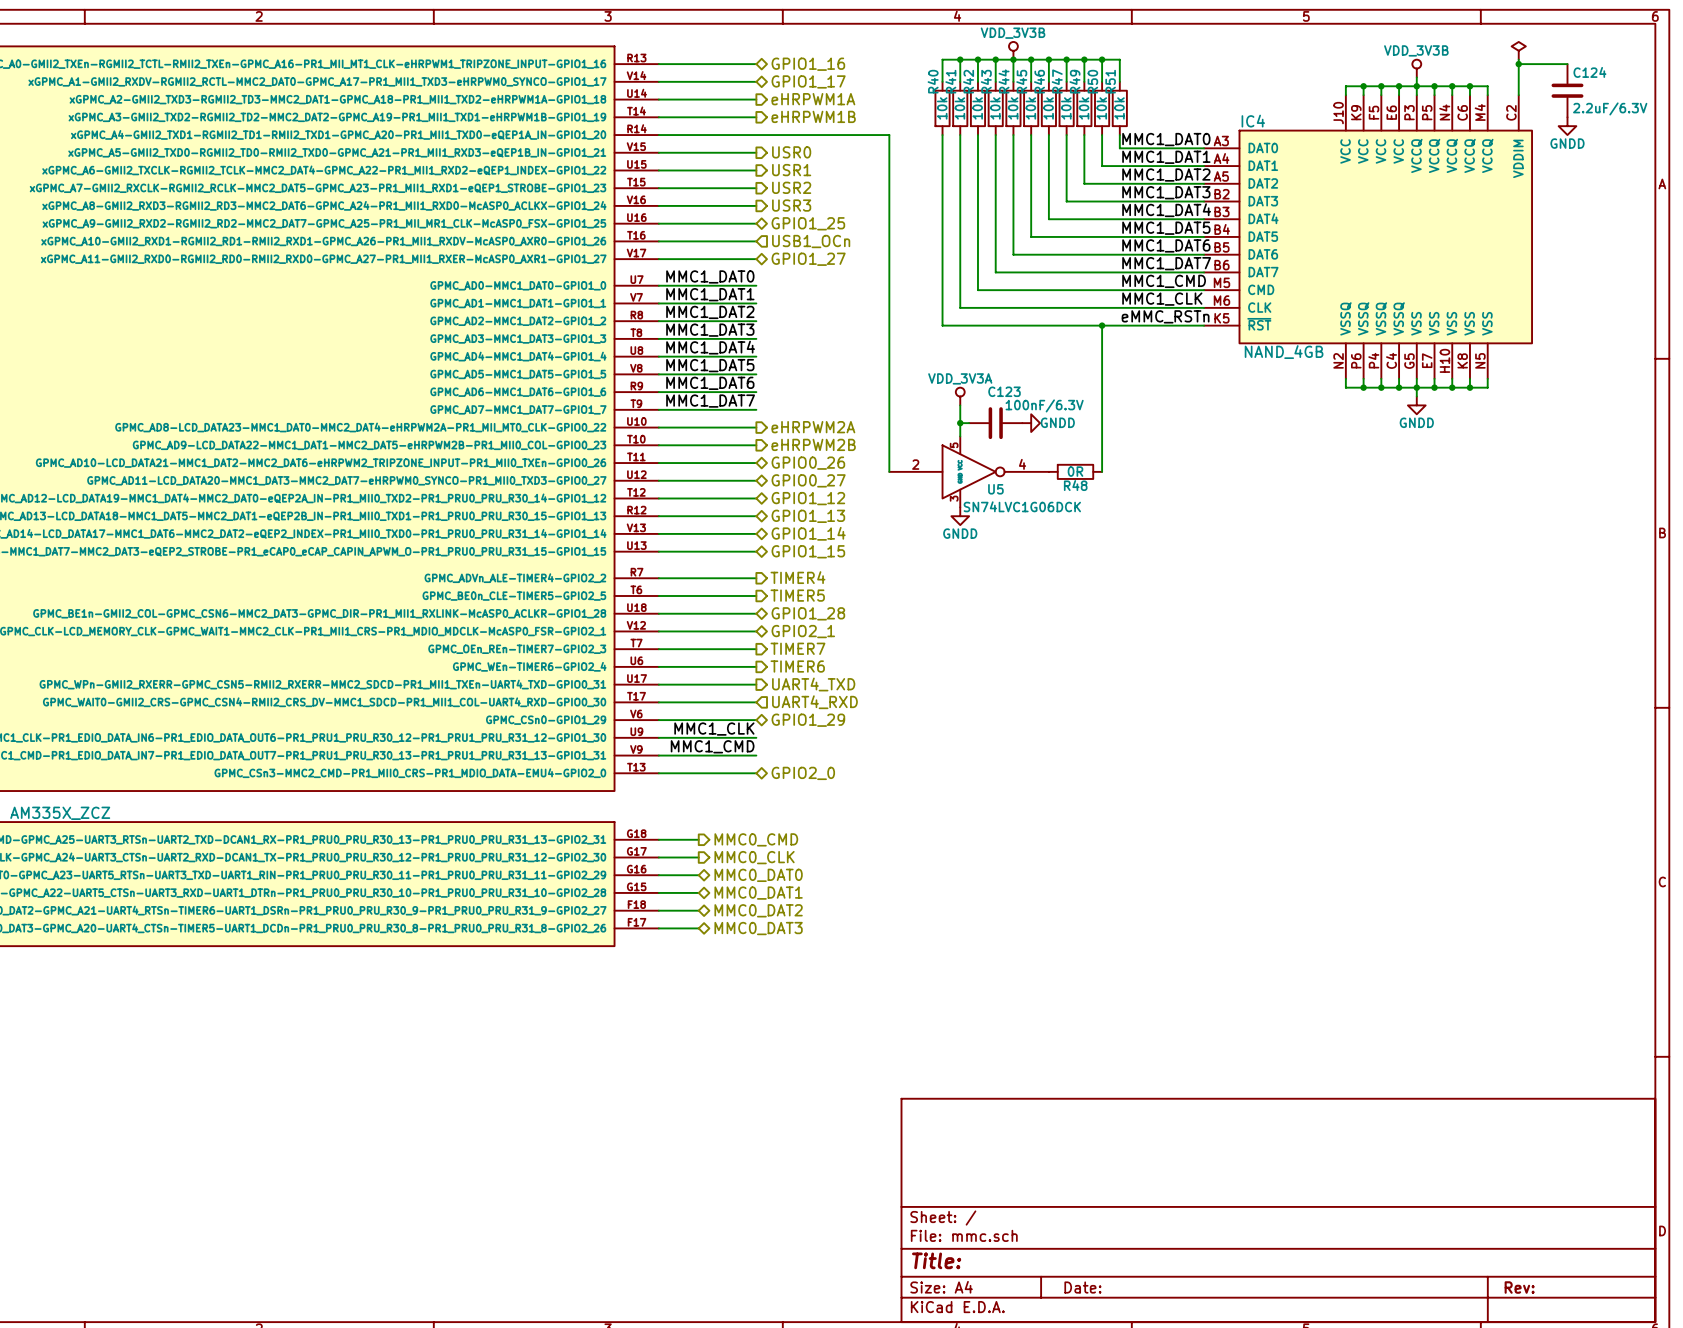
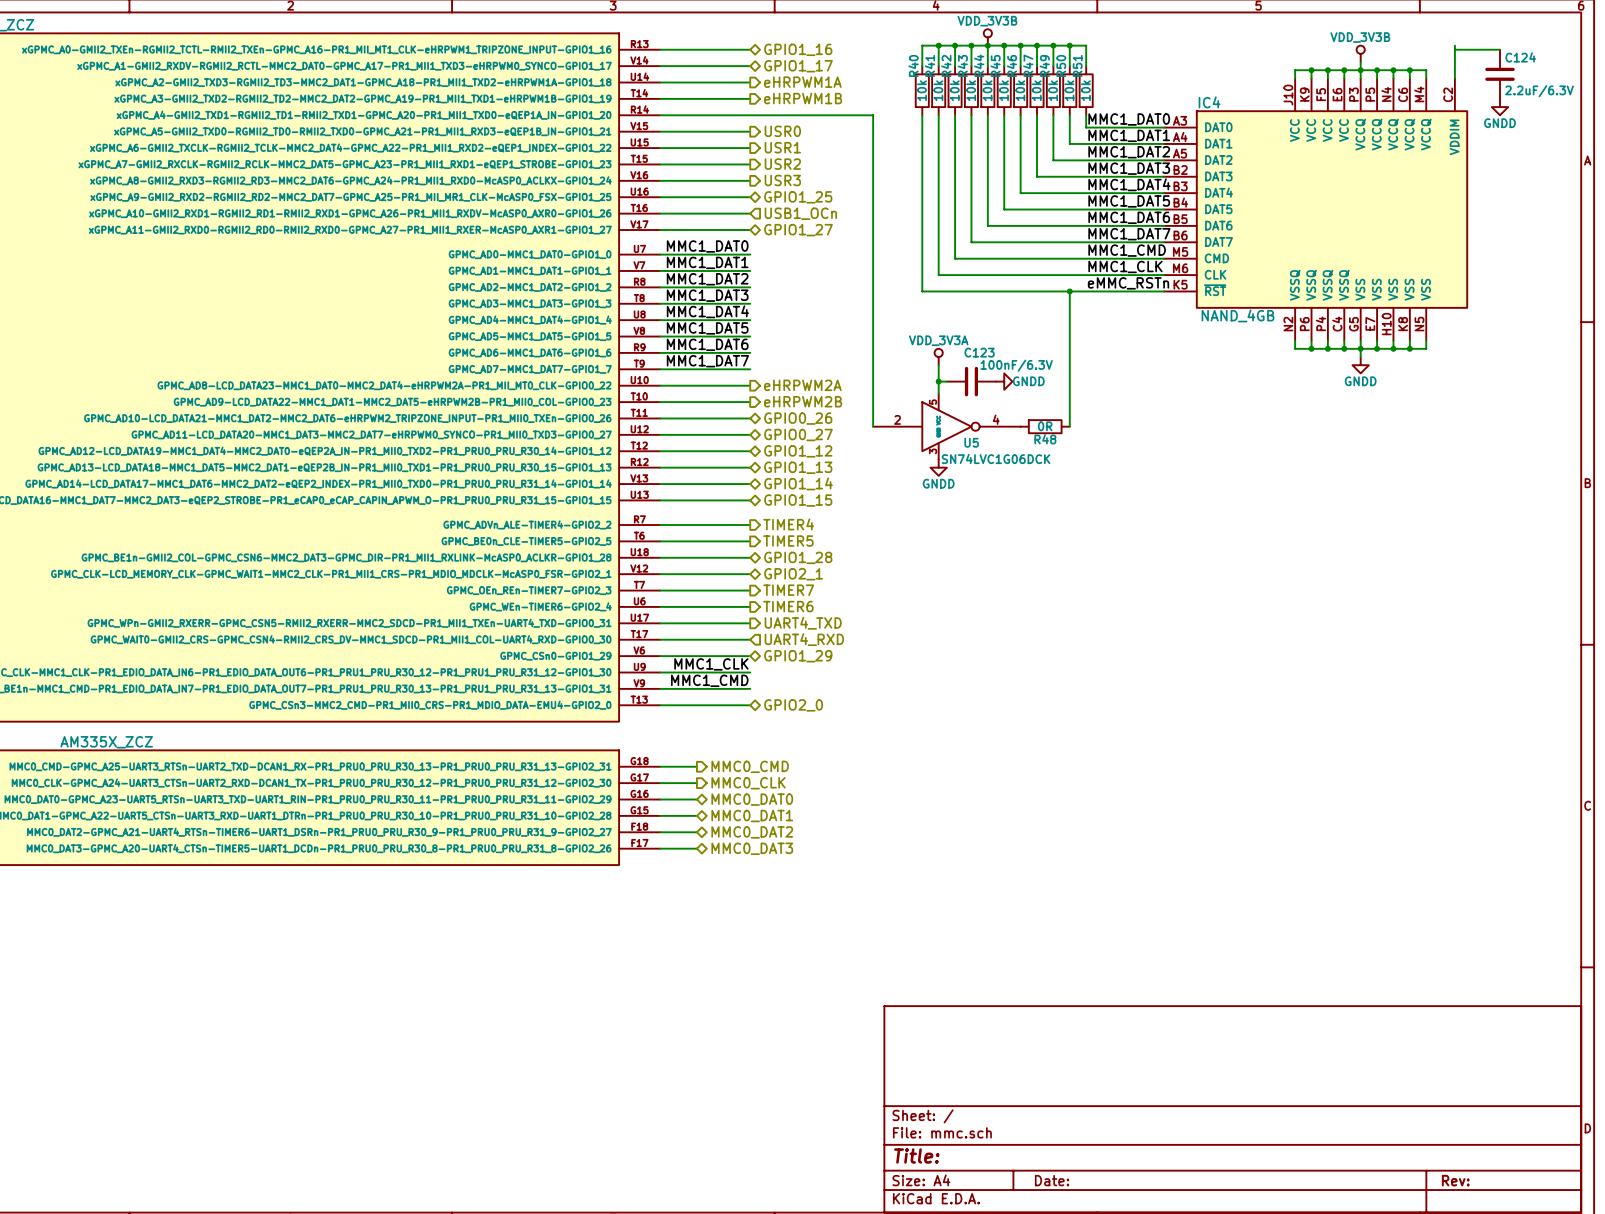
power symbol: (1518, 50) -> none
junction: (1518, 64) -> none

